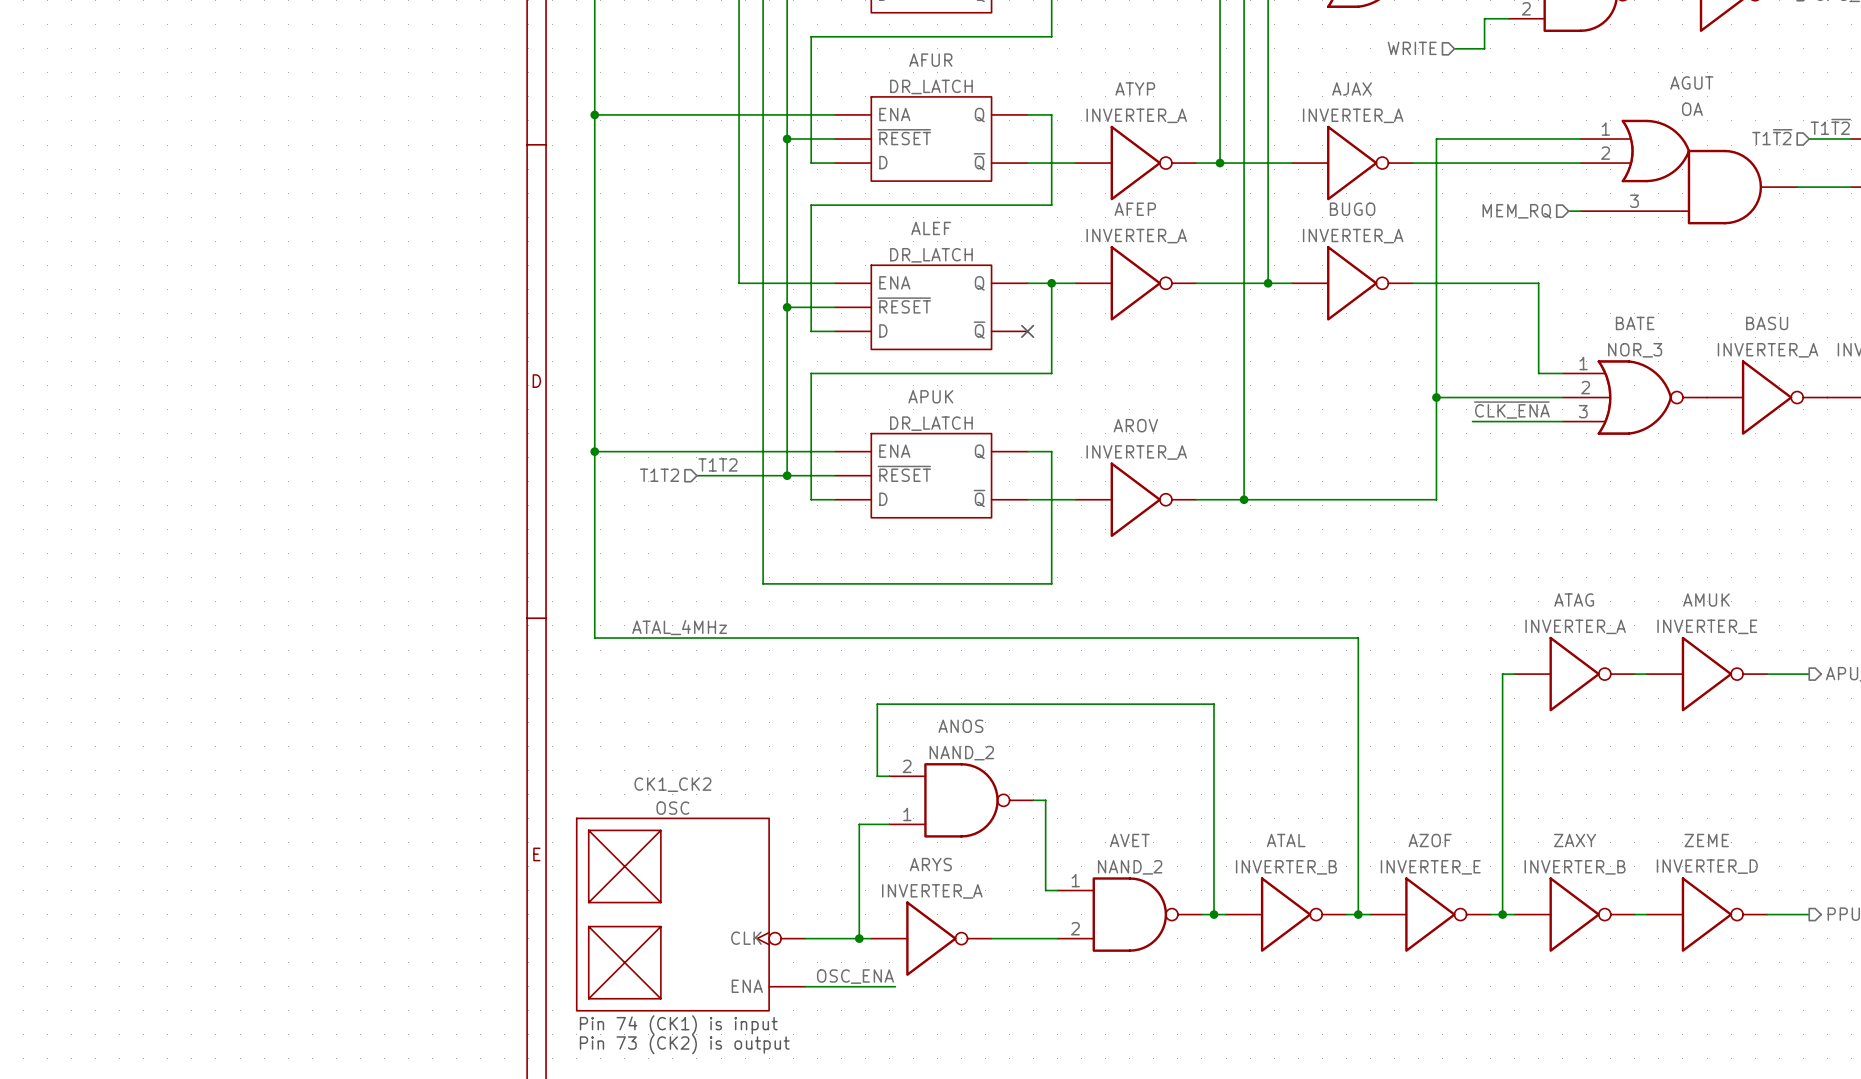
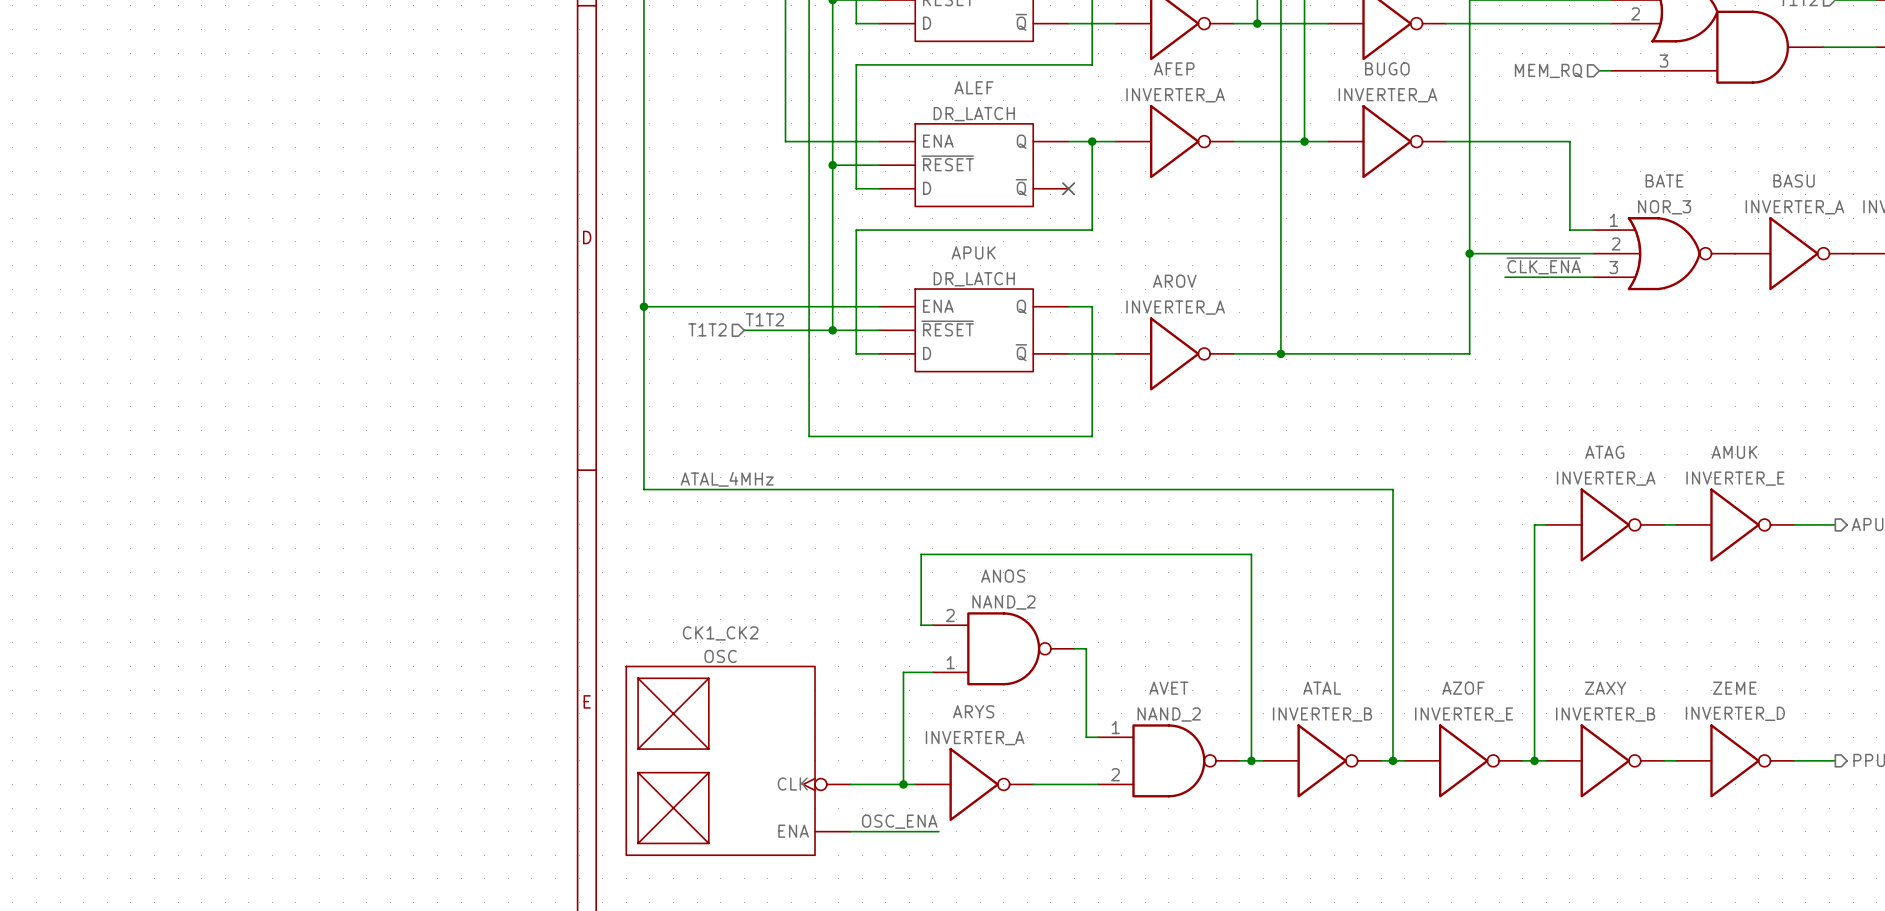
text: Pin 74 (CK1) is input (678, 1025) -> none
text: Pin 73 (CK2) is output (684, 1044) -> none

